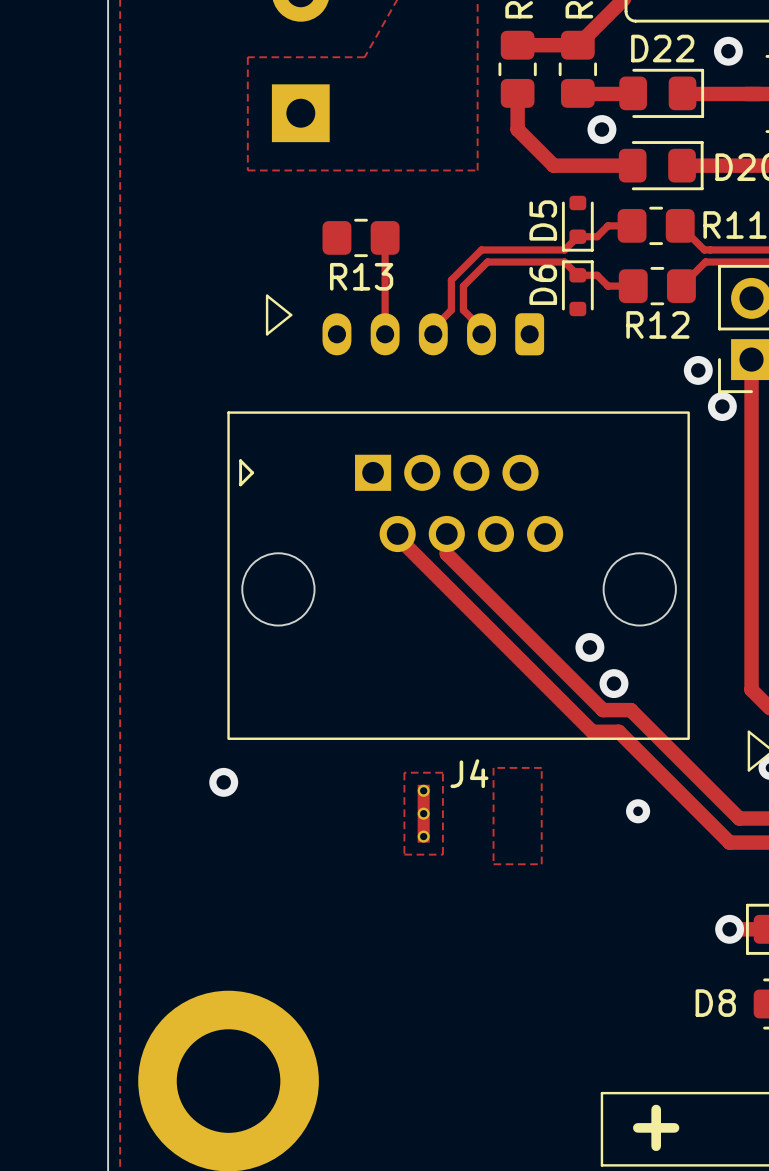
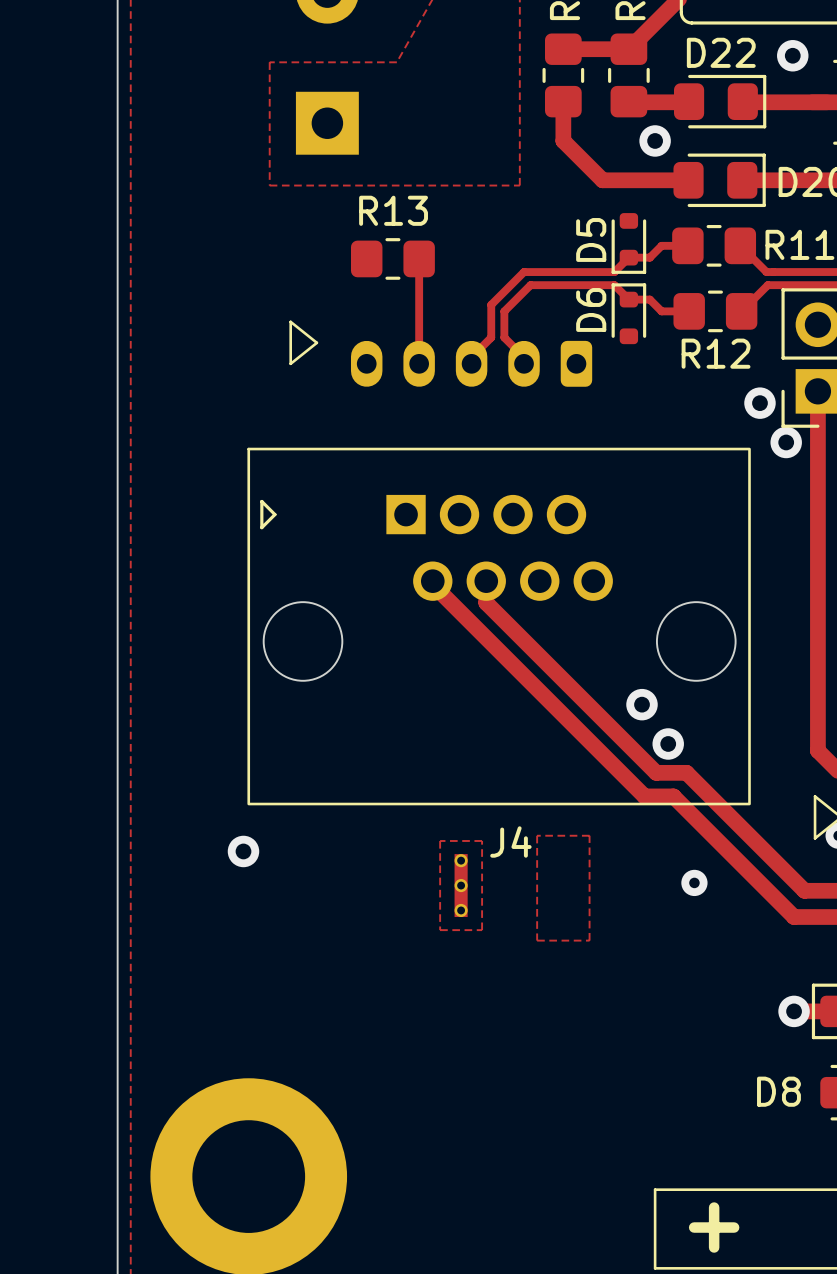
R13 name position: R13 (361, 276) -> R13 (393, 210)

